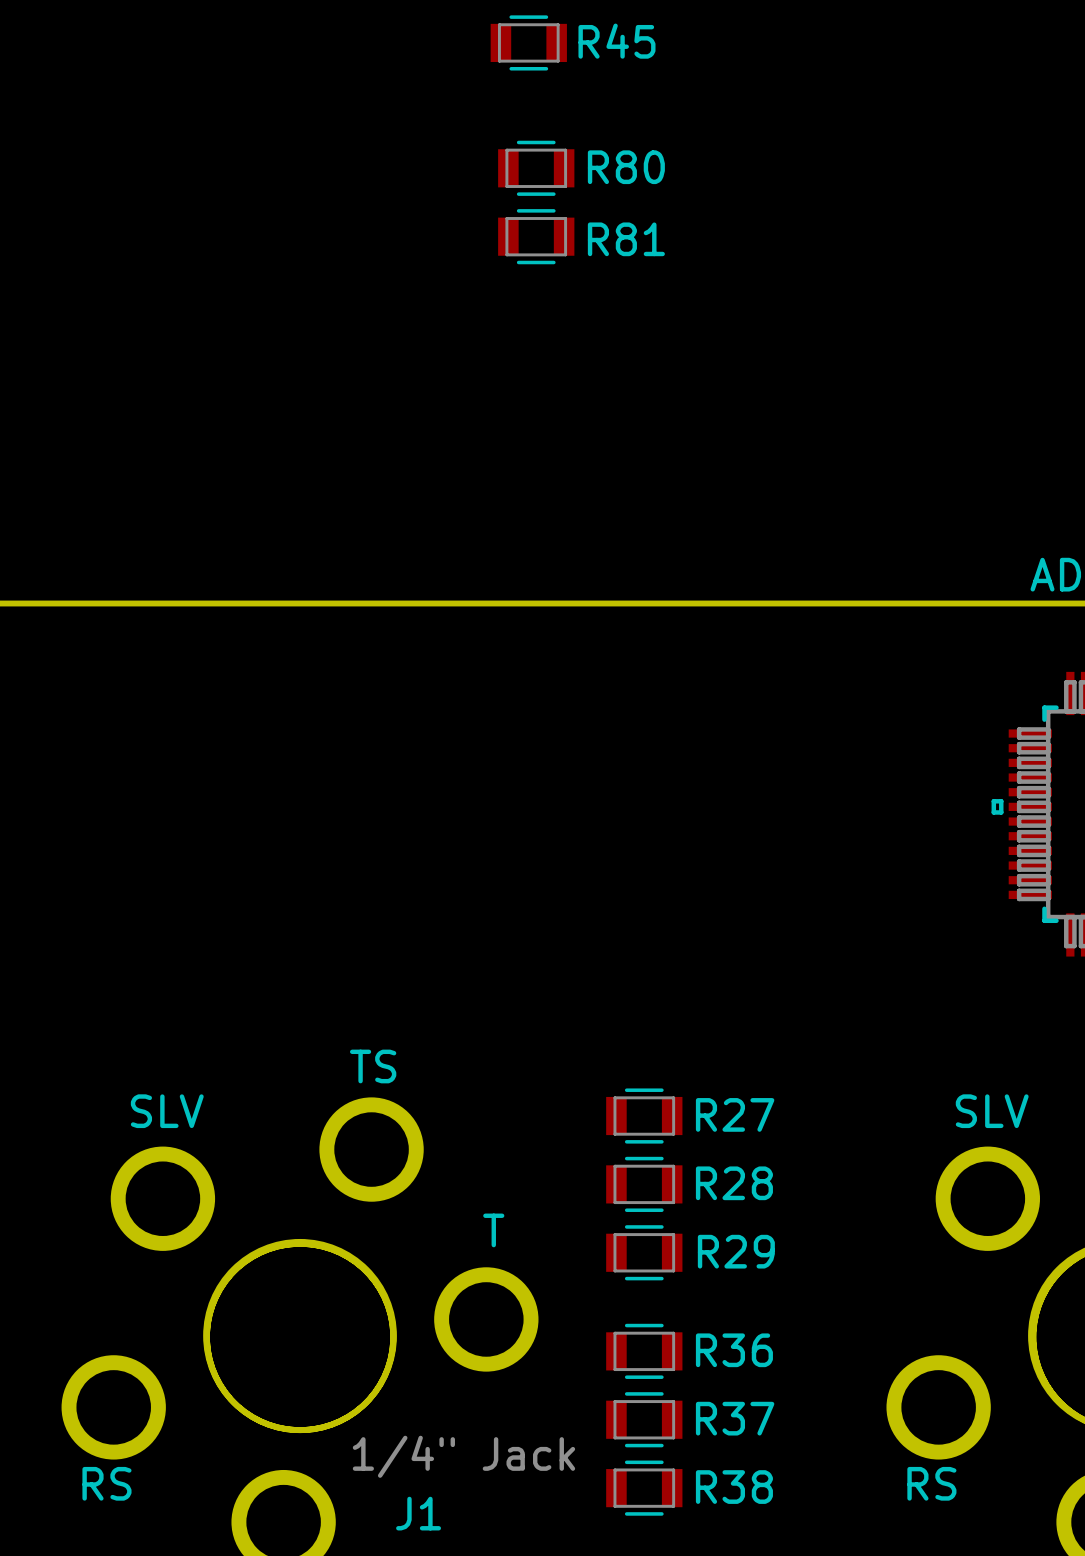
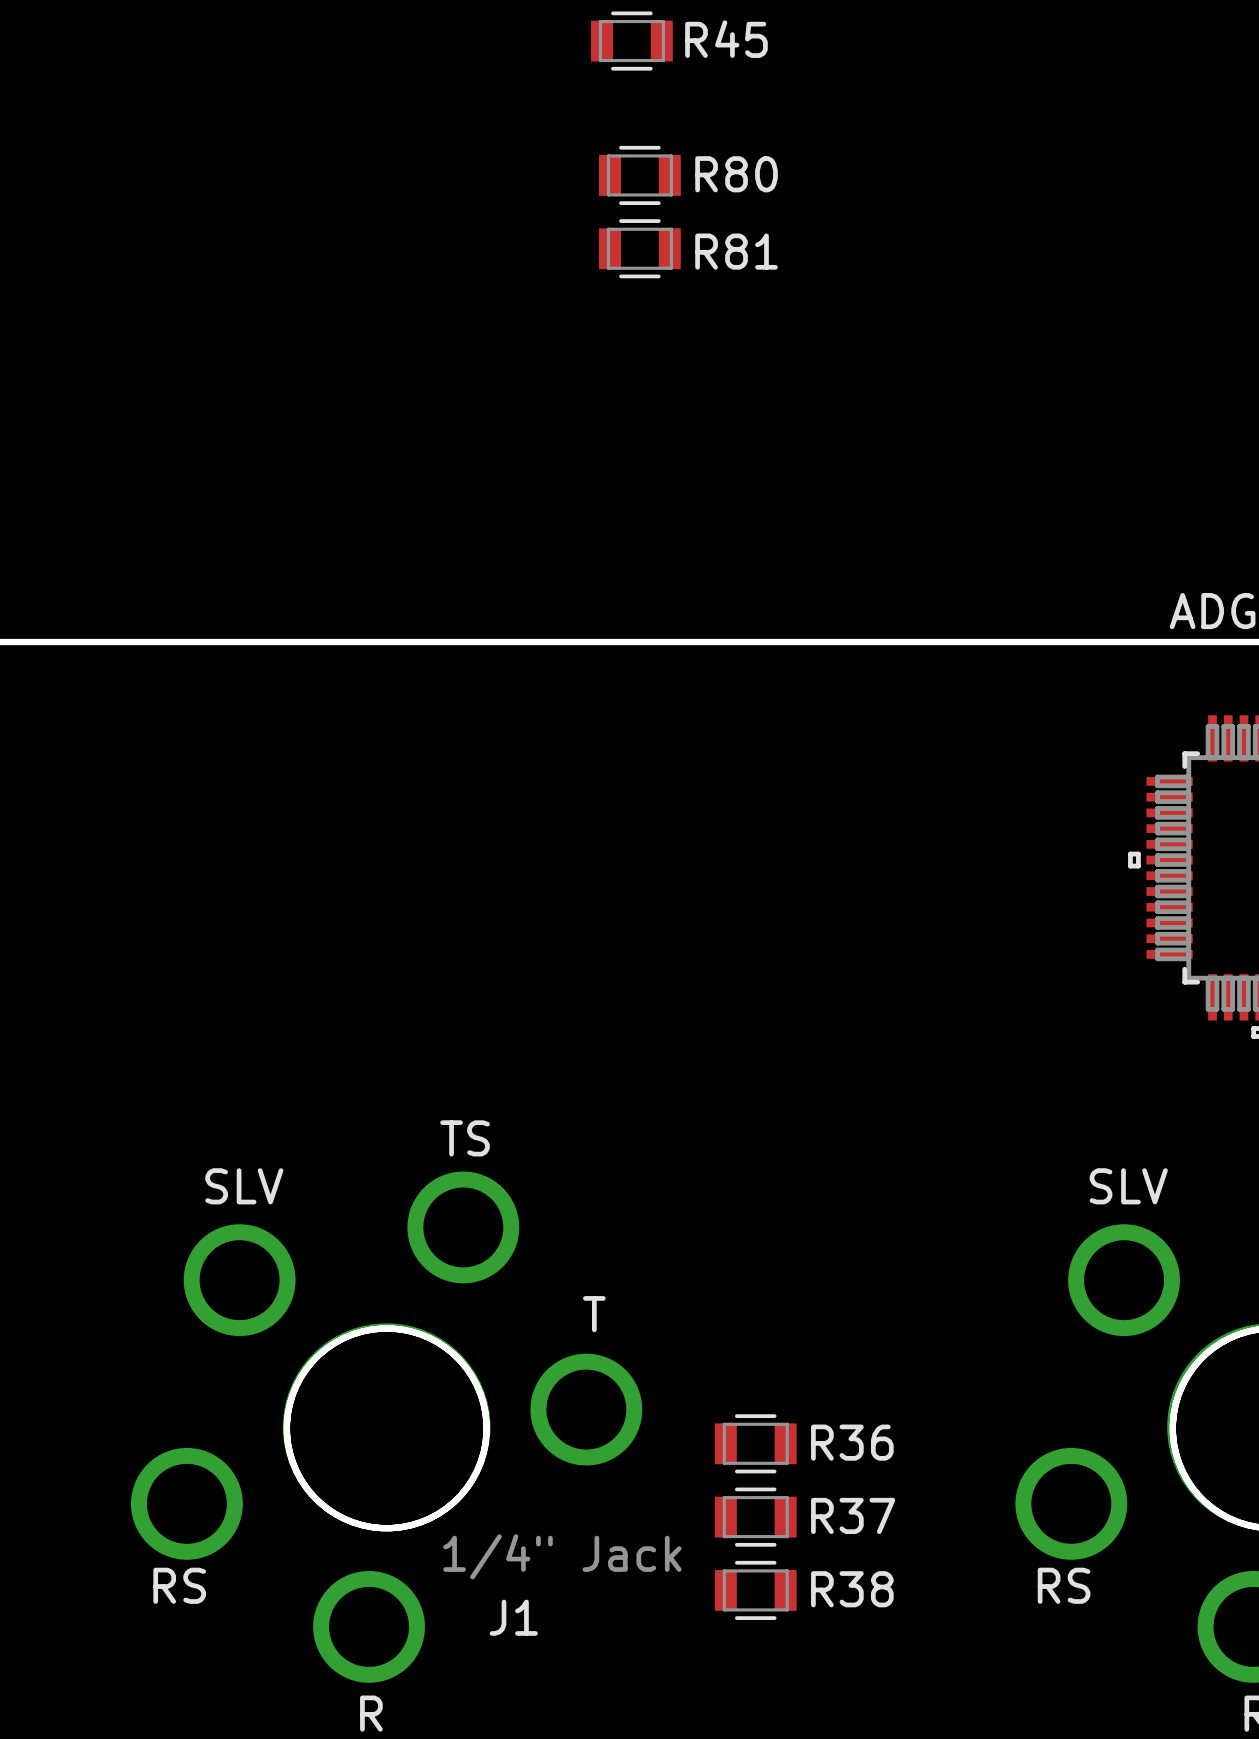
R27: (644, 1116) -> none
R28: (644, 1184) -> none
R29: (644, 1252) -> none

